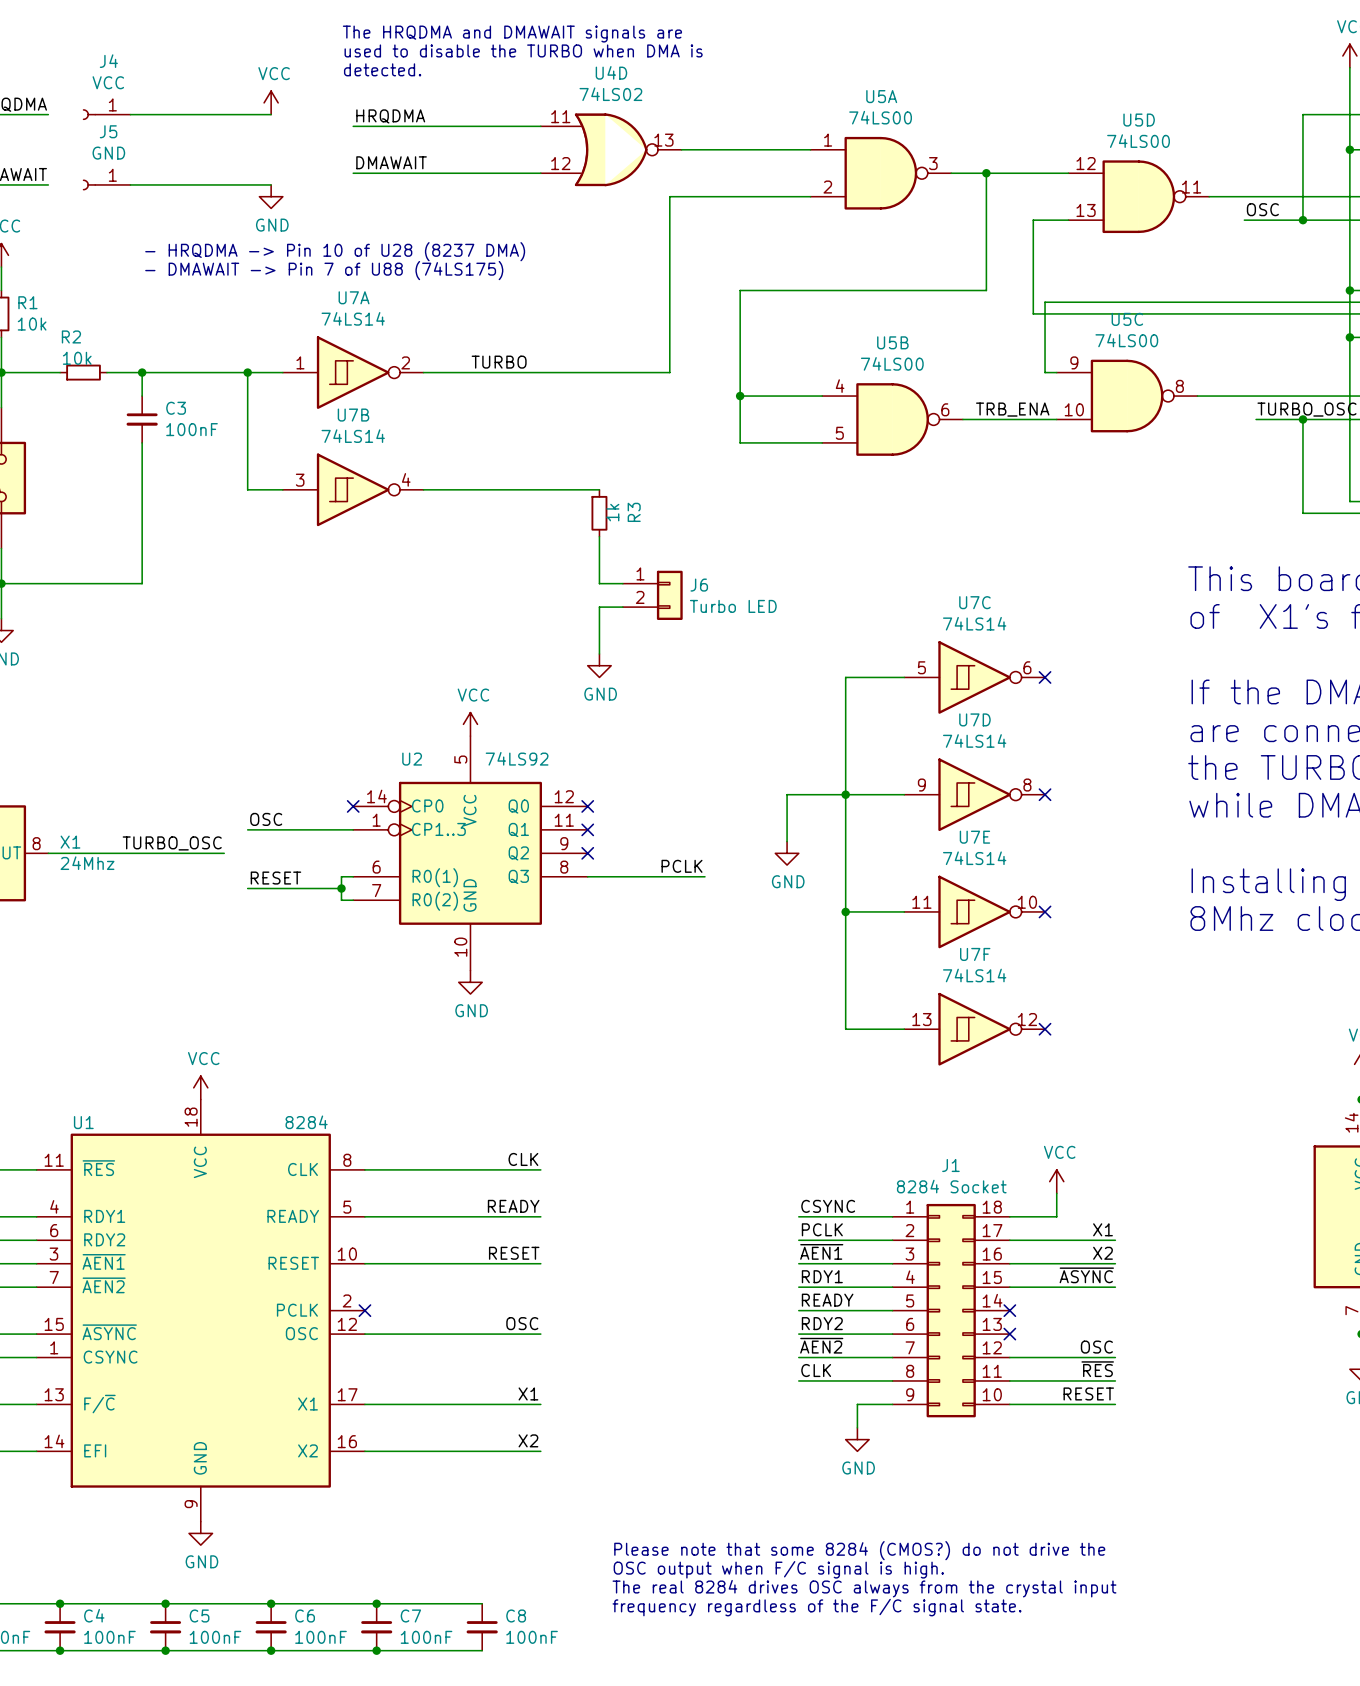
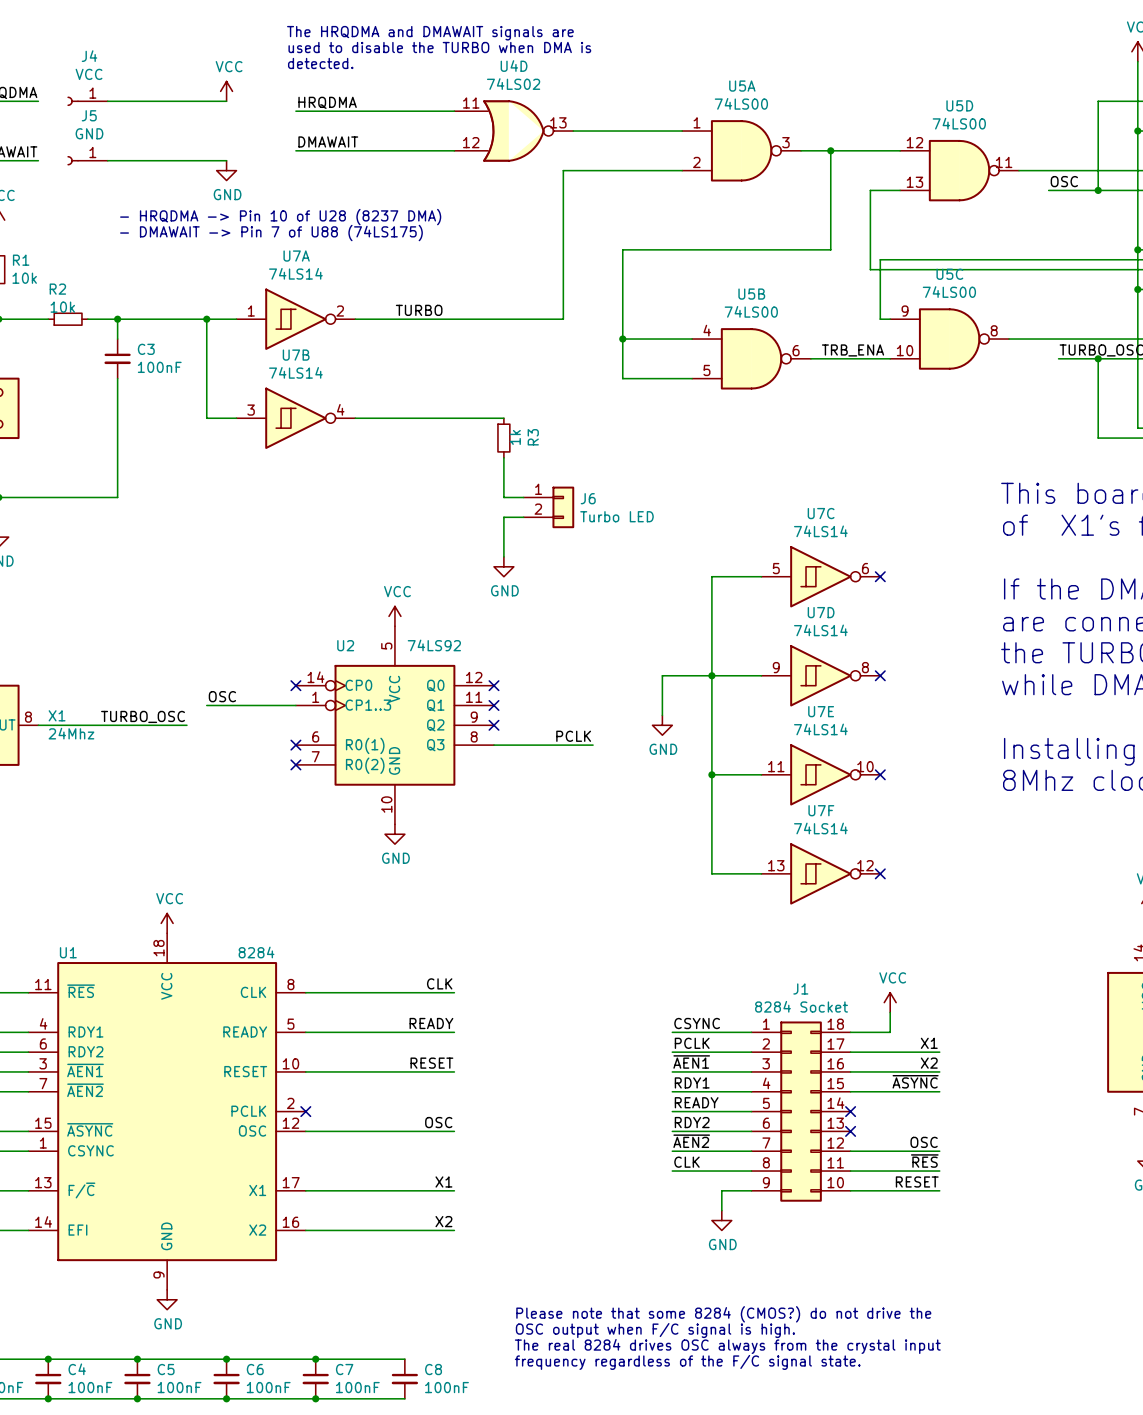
wire: (353, 876) (341, 876) (341, 900) (353, 900) -> none
no-connect mark: none -> (295, 745)
label: RESET (275, 878) -> none
wire: (247, 888) (341, 888) -> none
junction: (341, 888) -> none
no-connect mark: none -> (295, 764)

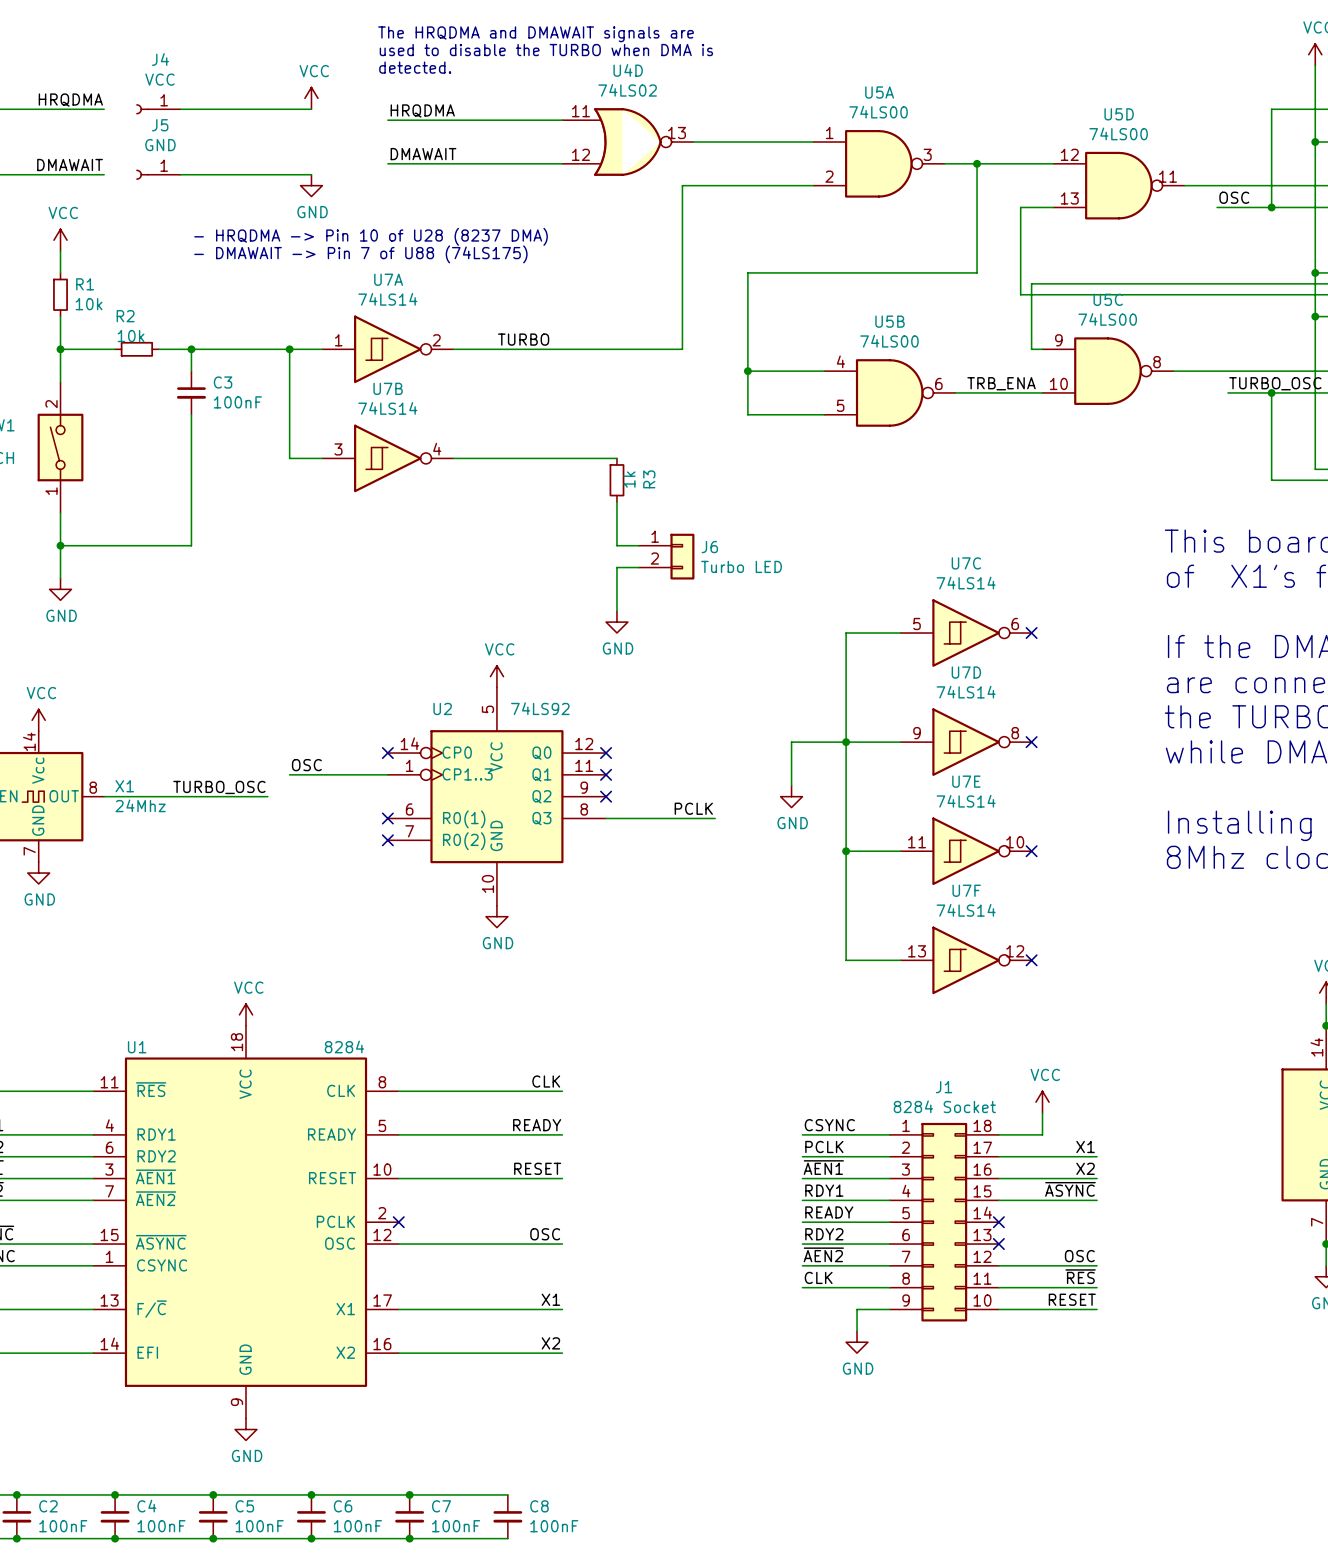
text: Please note that some 8284 (CMOS?) do not drive the (723, 1314) -> none
text: OSC output when F/C signal is high. (655, 1330) -> none
text: The real 8284 drives OSC always from the crystal input (727, 1346) -> none
text: frequency regardless of the F/C signal state. (687, 1362) -> none

